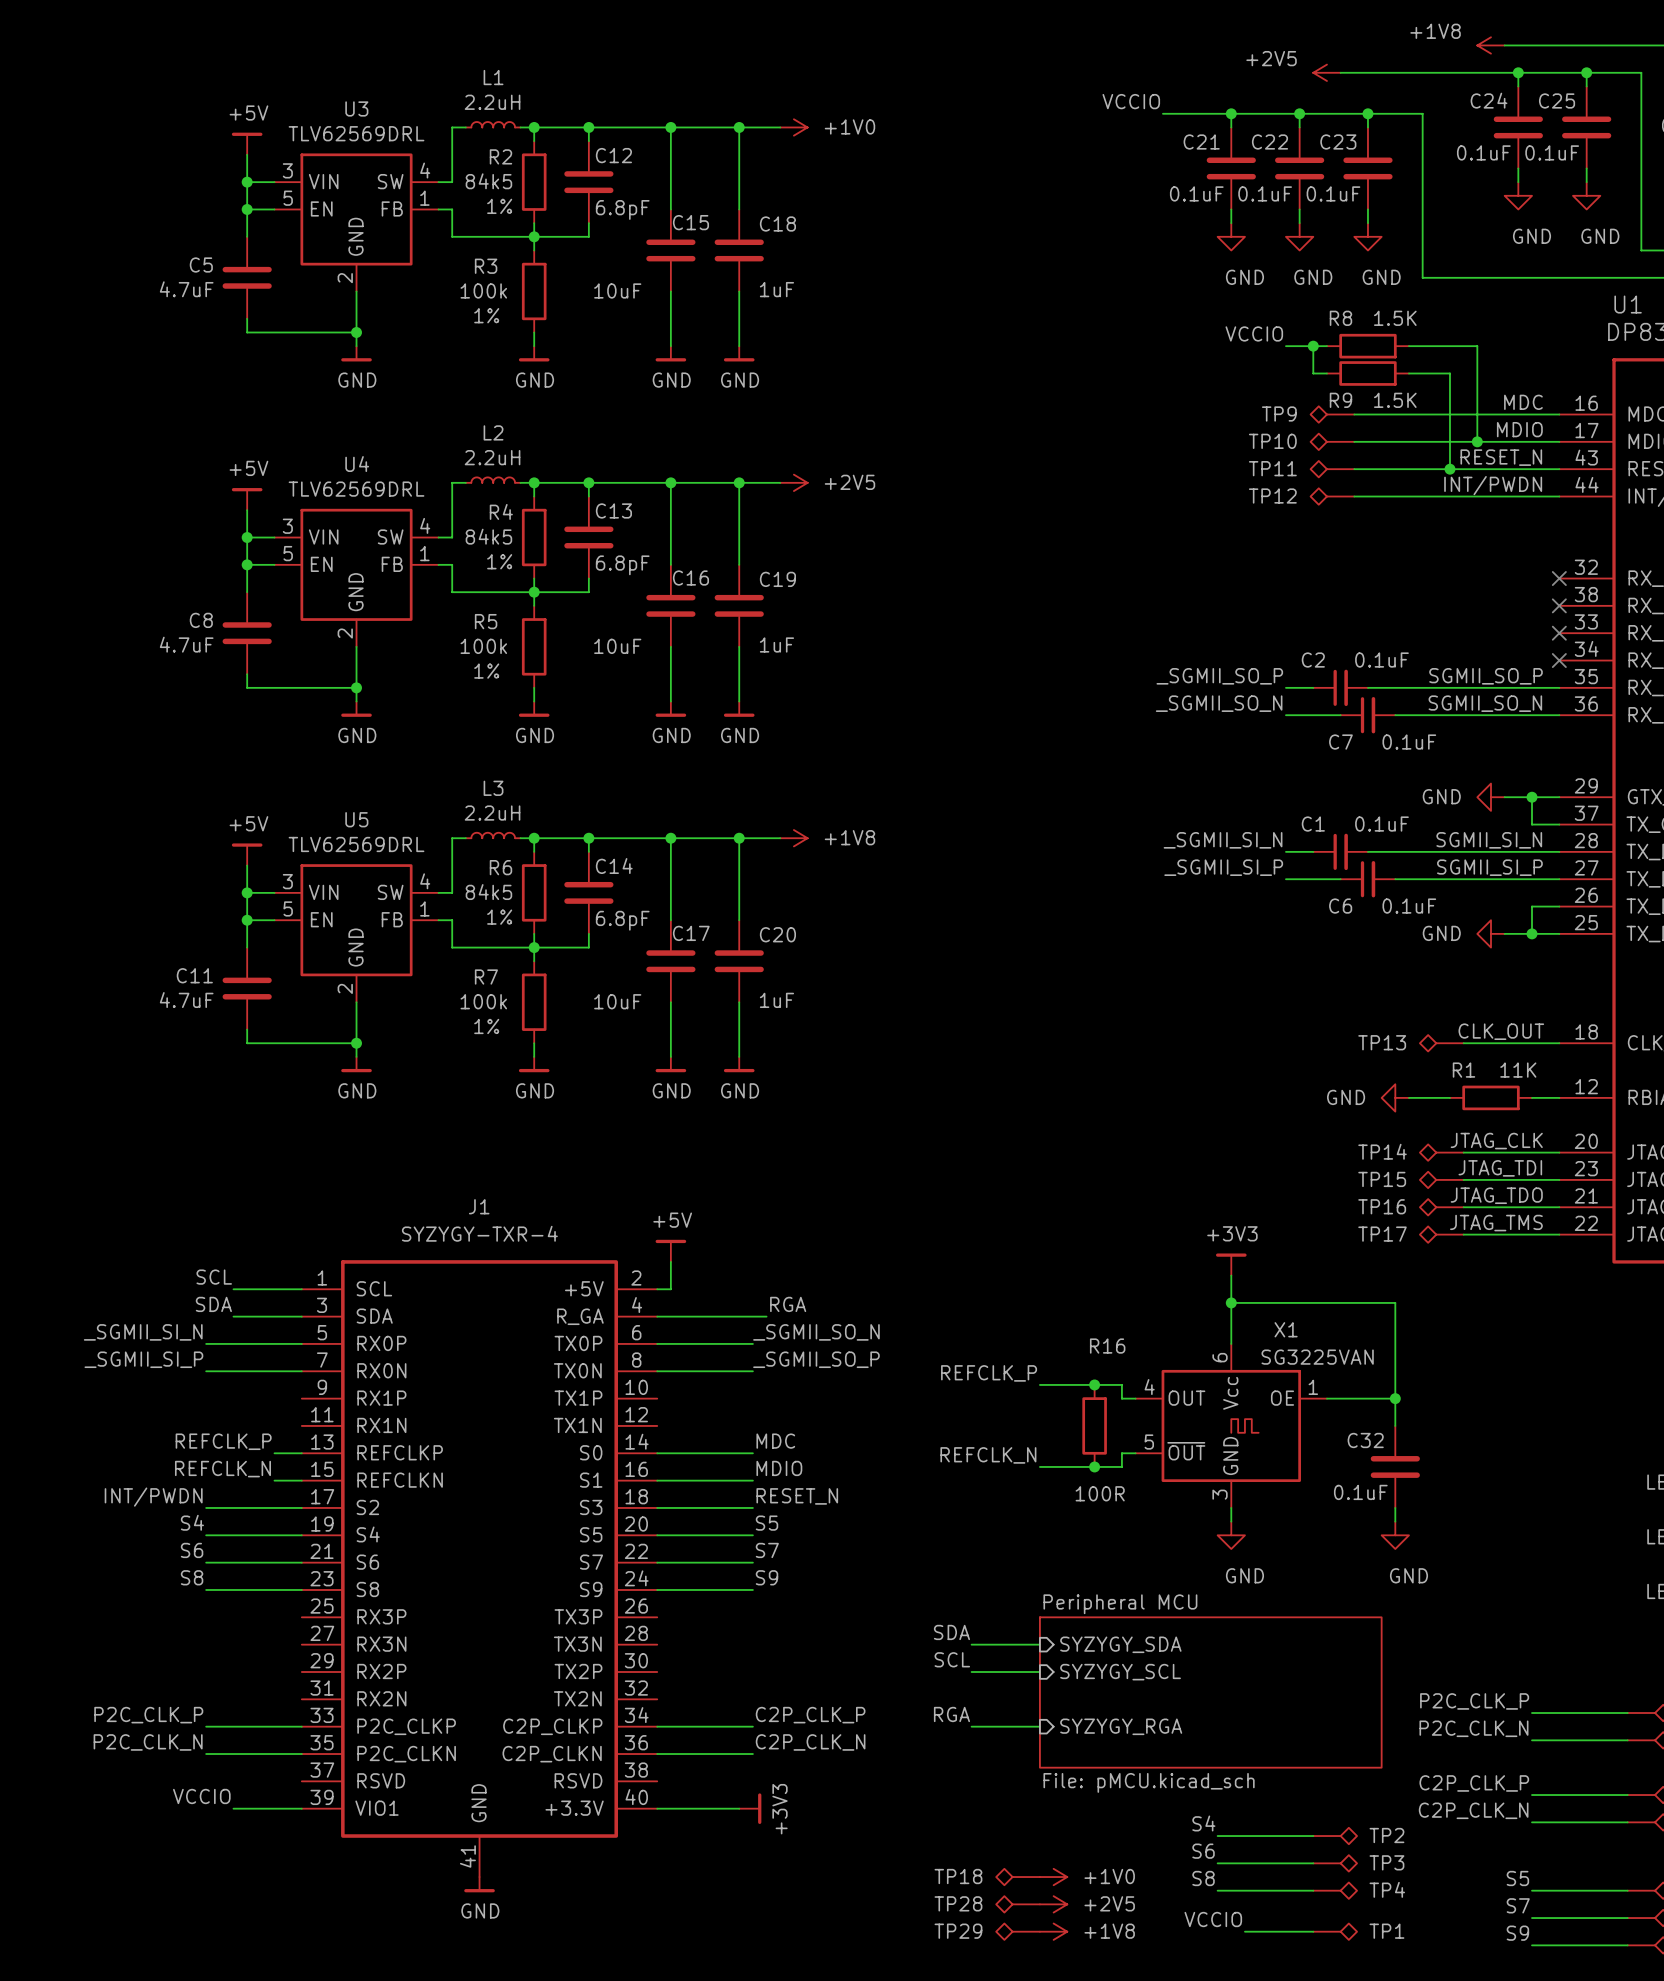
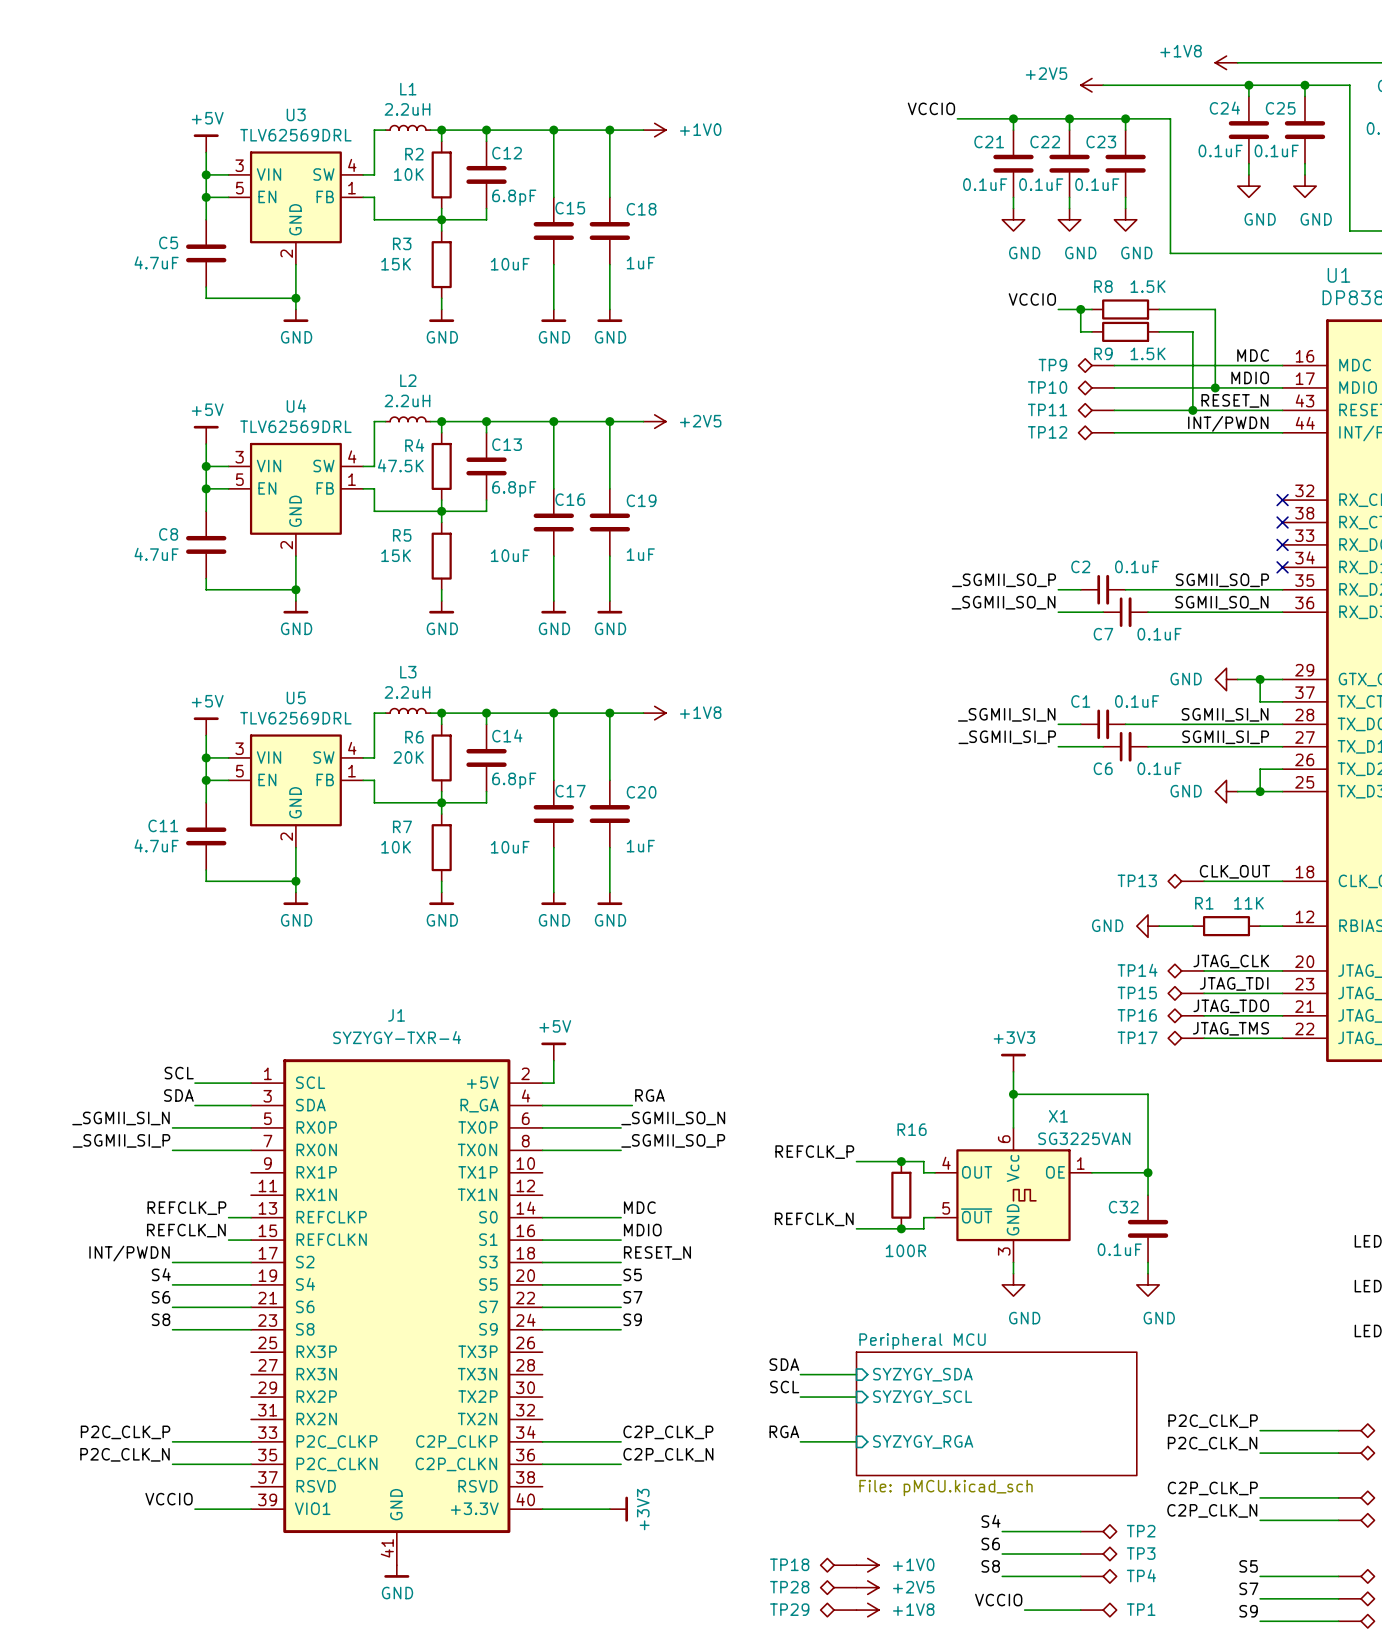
R2 value: 84k5 (488, 181) -> 10K (408, 174)
R2 text: 1% (499, 206) -> none
R3 value: 100k (483, 290) -> 15K (396, 264)
R3 text: 1% (486, 315) -> none
R4 value: 84k5 (488, 536) -> 47.5K (400, 465)
R4 text: 1% (499, 561) -> none
R5 value: 100k (483, 646) -> 15K (396, 555)
R5 text: 1% (486, 671) -> none
R6 value: 84k5 (488, 892) -> 20K (408, 757)
R6 text: 1% (499, 917) -> none
R7 value: 100k (483, 1001) -> 10K (396, 847)
R7 text: 1% (486, 1026) -> none

